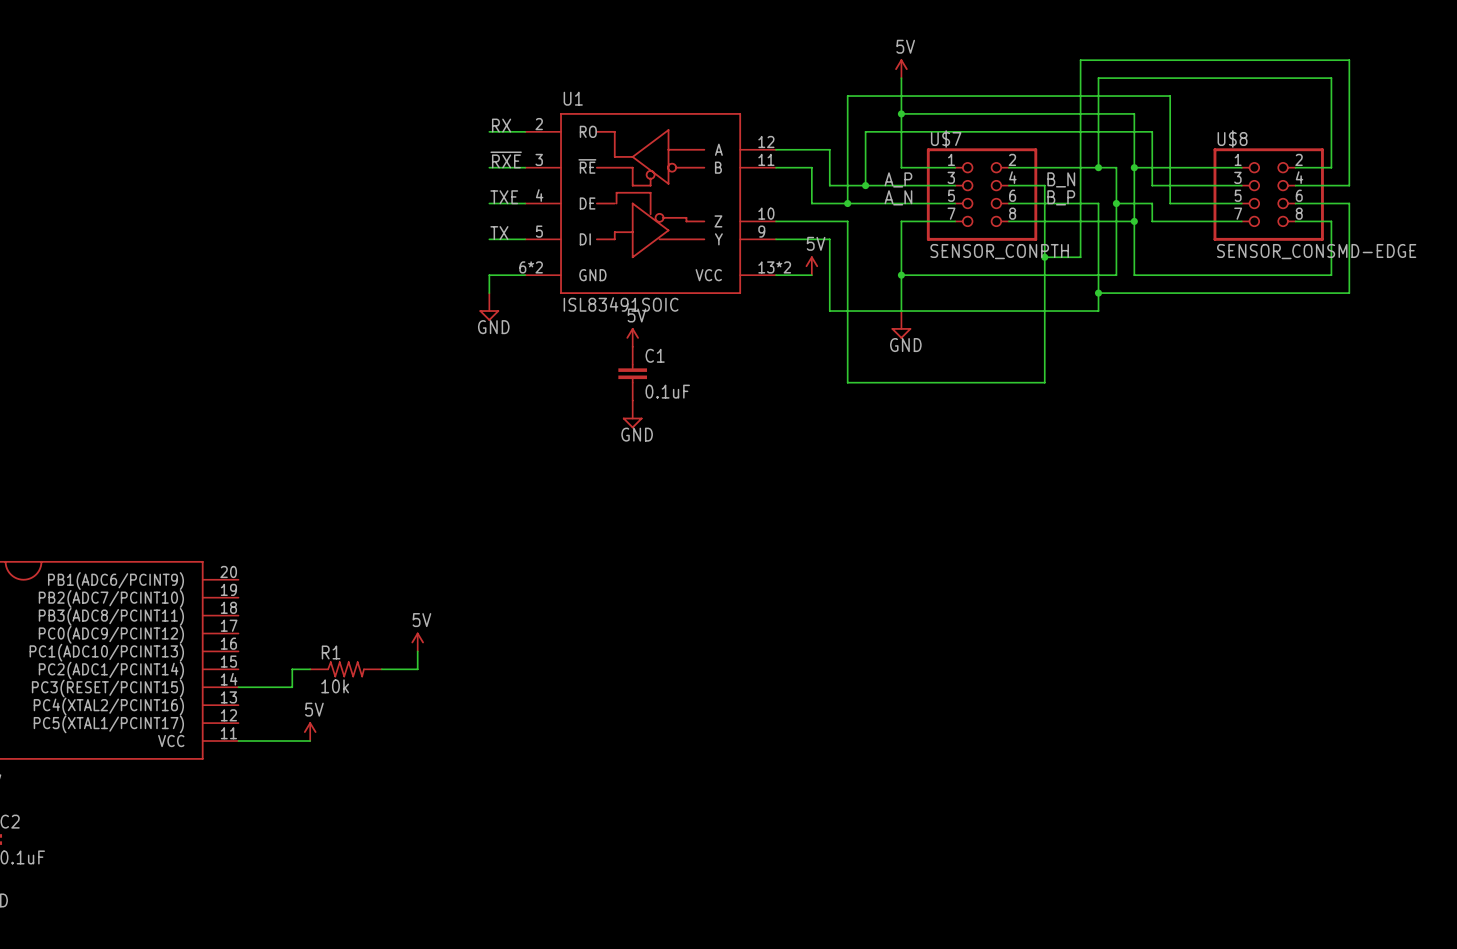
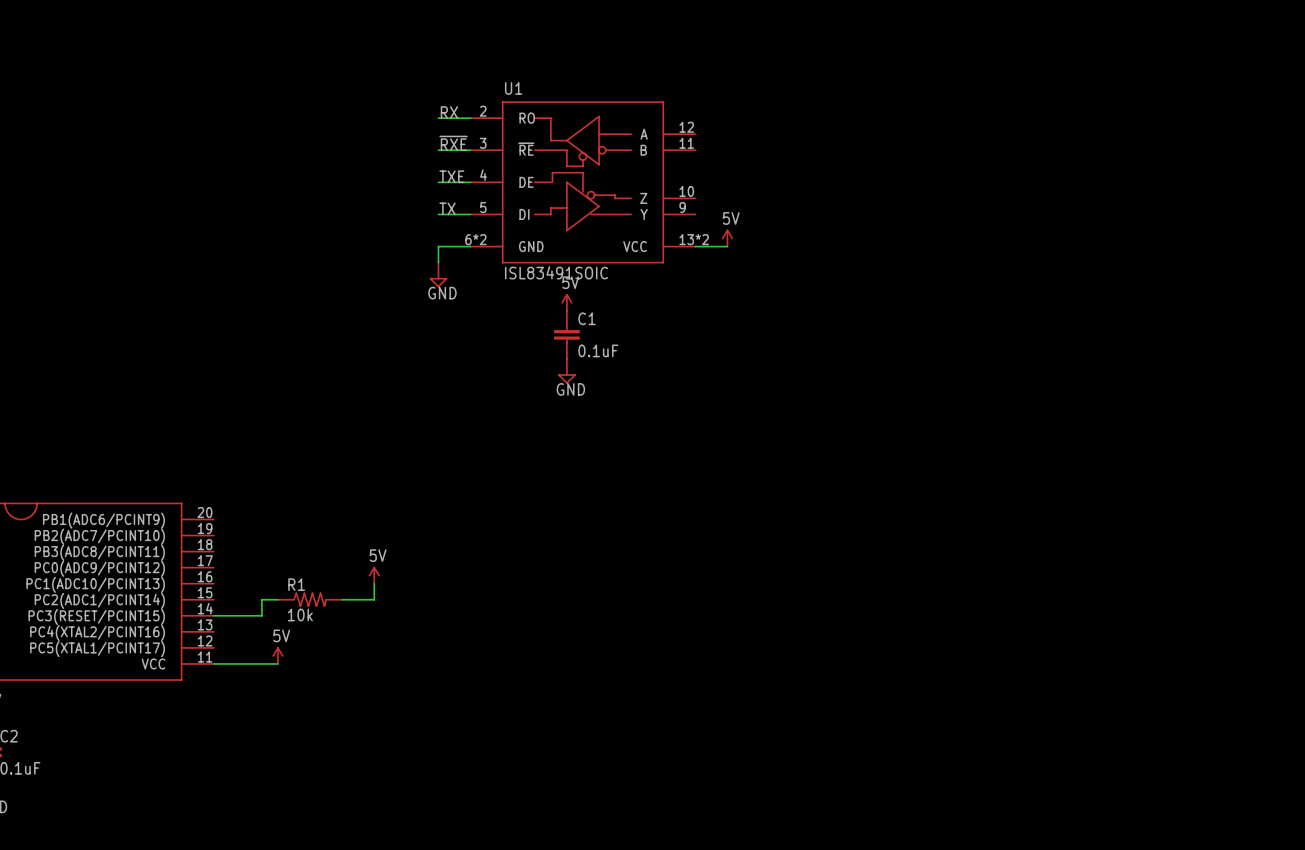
power symbol: 5V (901, 68) -> none
wire: (901, 78) (901, 167) (955, 167) -> none
wire: (901, 113) (1134, 113) (1134, 275) (1331, 275) (1331, 221) (1295, 221) -> none
junction: (901, 113) -> none
wire: (776, 149) (829, 149) (829, 185) (955, 185) -> none
wire: (776, 167) (811, 167) (811, 203) (955, 203) -> none
wire: (1008, 167) (1116, 167) (1116, 275) (901, 275) -> none
wire: (1098, 167) (1098, 78) (1331, 78) (1331, 167) (1295, 167) -> none
junction: (1098, 167) -> none
wire: (1134, 167) (1241, 167) -> none
junction: (1134, 167) -> none
label: A_P (898, 179) -> none
label: B_N (1061, 179) -> none
wire: (865, 185) (865, 131) (1152, 131) (1152, 185) (1241, 185) -> none
junction: (865, 185) -> none
wire: (1008, 185) (1044, 185) (1044, 382) (847, 382) (847, 221) (776, 221) -> none
wire: (1295, 185) (1349, 185) (1349, 60) (1080, 60) (1080, 257) (1044, 257) -> none
U$7: SENSOR_CONPTH (982, 194) -> none
U$8: SENSOR_CONSMD-EDGE (1268, 194) -> none
label: A_N (898, 197) -> none
label: B_P (1061, 197) -> none
wire: (847, 203) (847, 96) (1170, 96) (1170, 203) (1241, 203) -> none
junction: (847, 203) -> none
wire: (1008, 203) (1098, 203) (1098, 311) (829, 311) (829, 239) (776, 239) -> none
wire: (1116, 203) (1152, 203) (1152, 221) (1241, 221) -> none
junction: (1116, 203) -> none
wire: (1295, 203) (1349, 203) (1349, 293) (1098, 293) -> none
wire: (955, 221) (901, 221) (901, 311) -> none
wire: (1008, 221) (1134, 221) -> none
junction: (1134, 221) -> none
junction: (1044, 257) -> none
junction: (901, 275) -> none
junction: (1098, 293) -> none
power symbol: GND (901, 324) -> none

